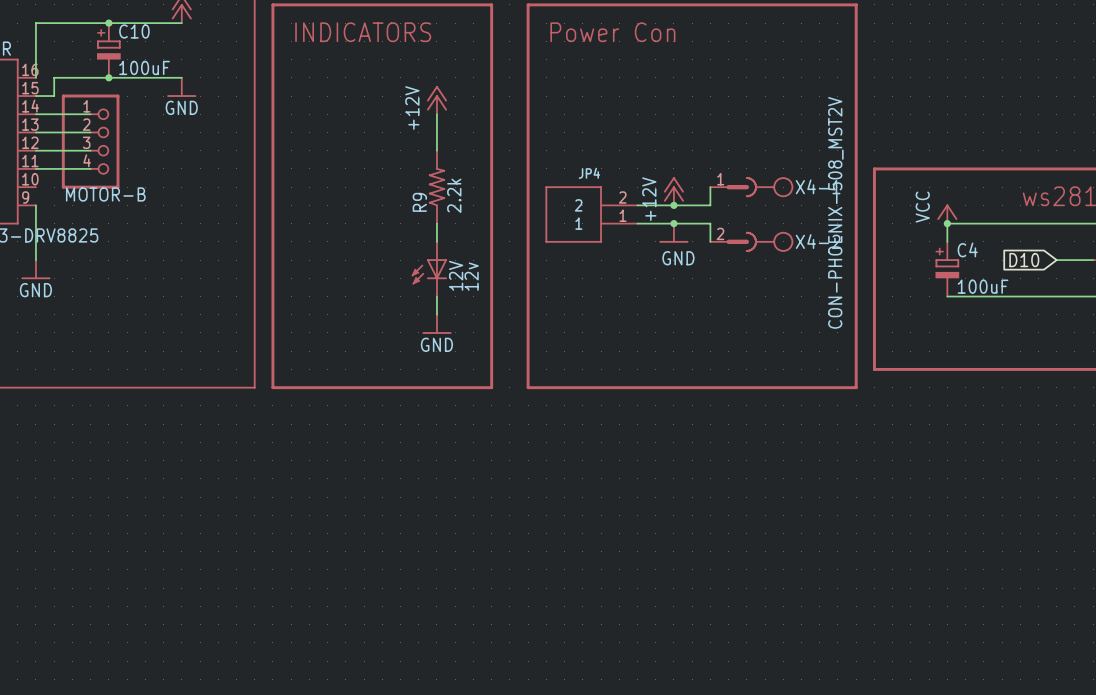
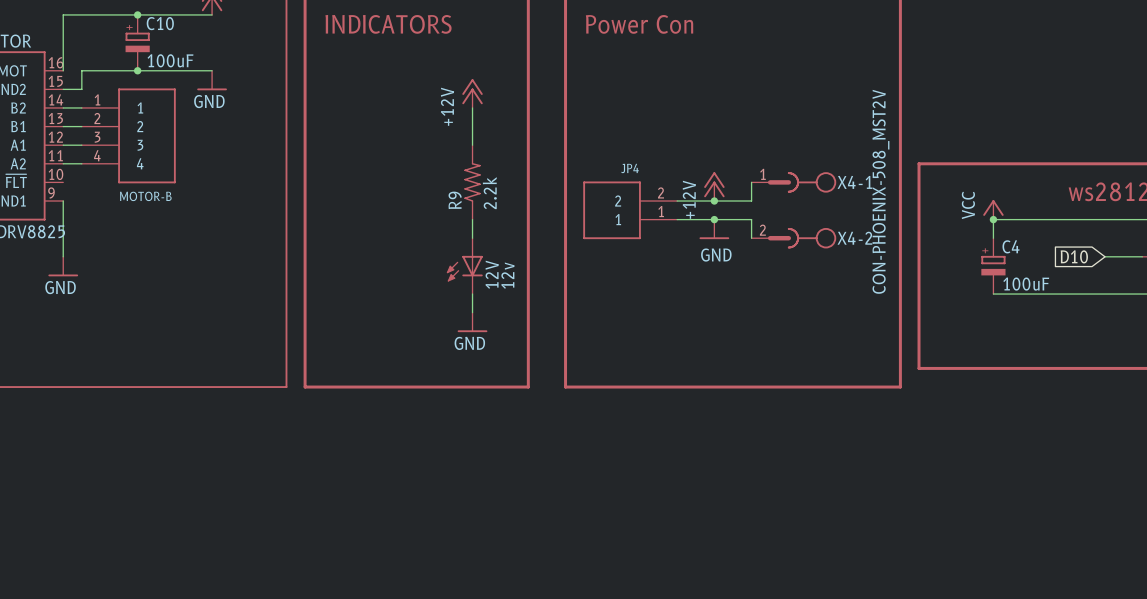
MOTOR-B: (90, 141) -> none
MOTOR-B: none -> (128, 135)

